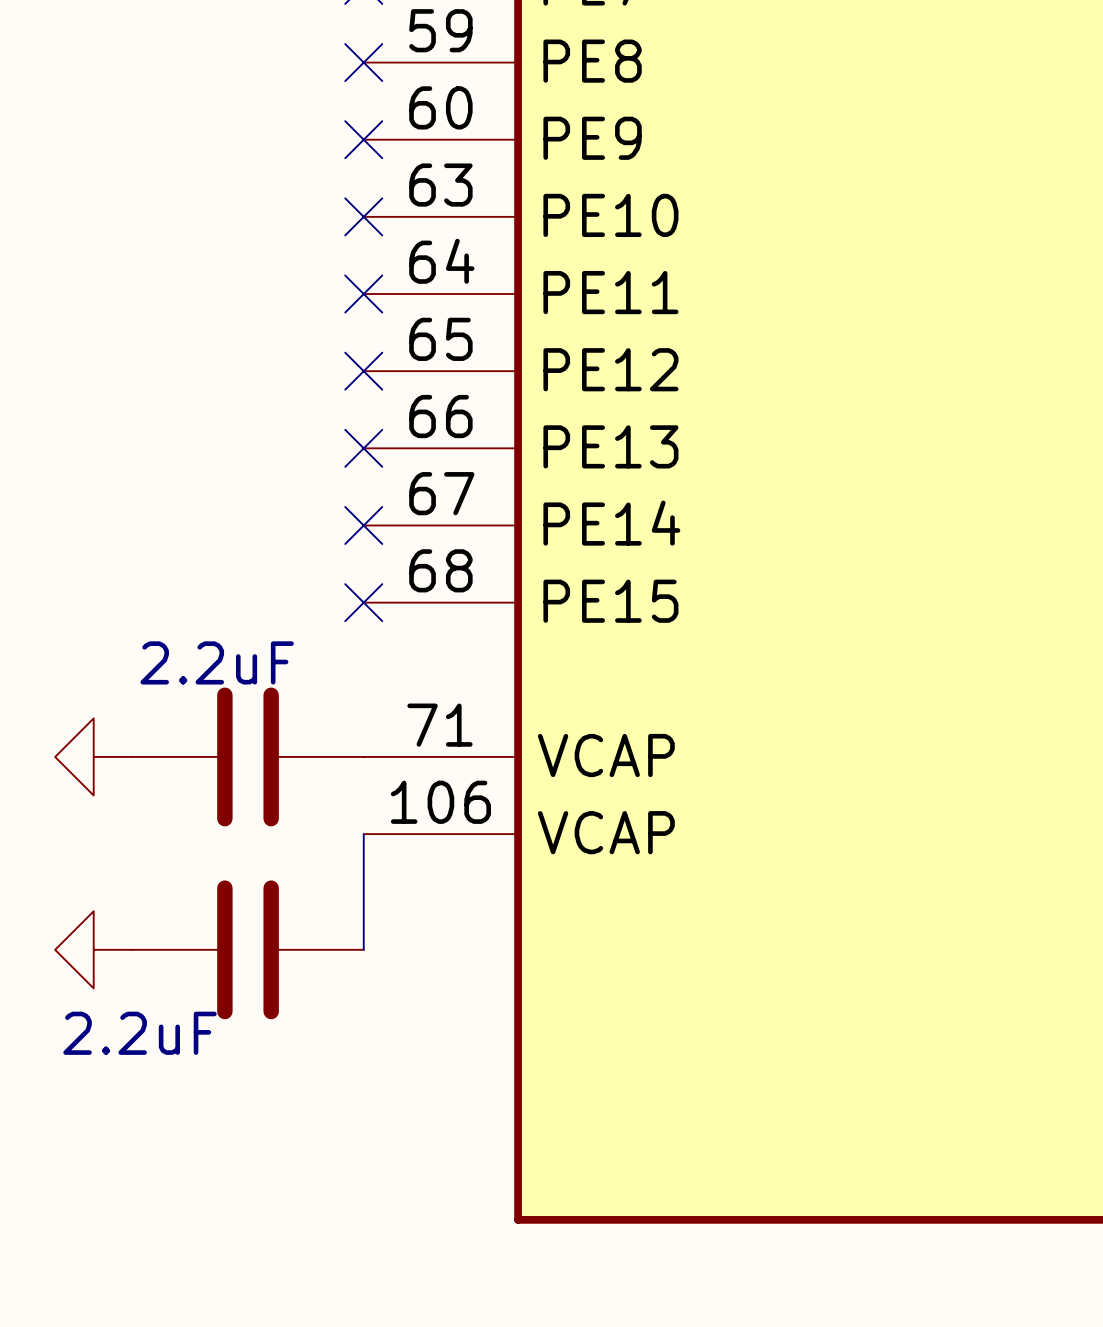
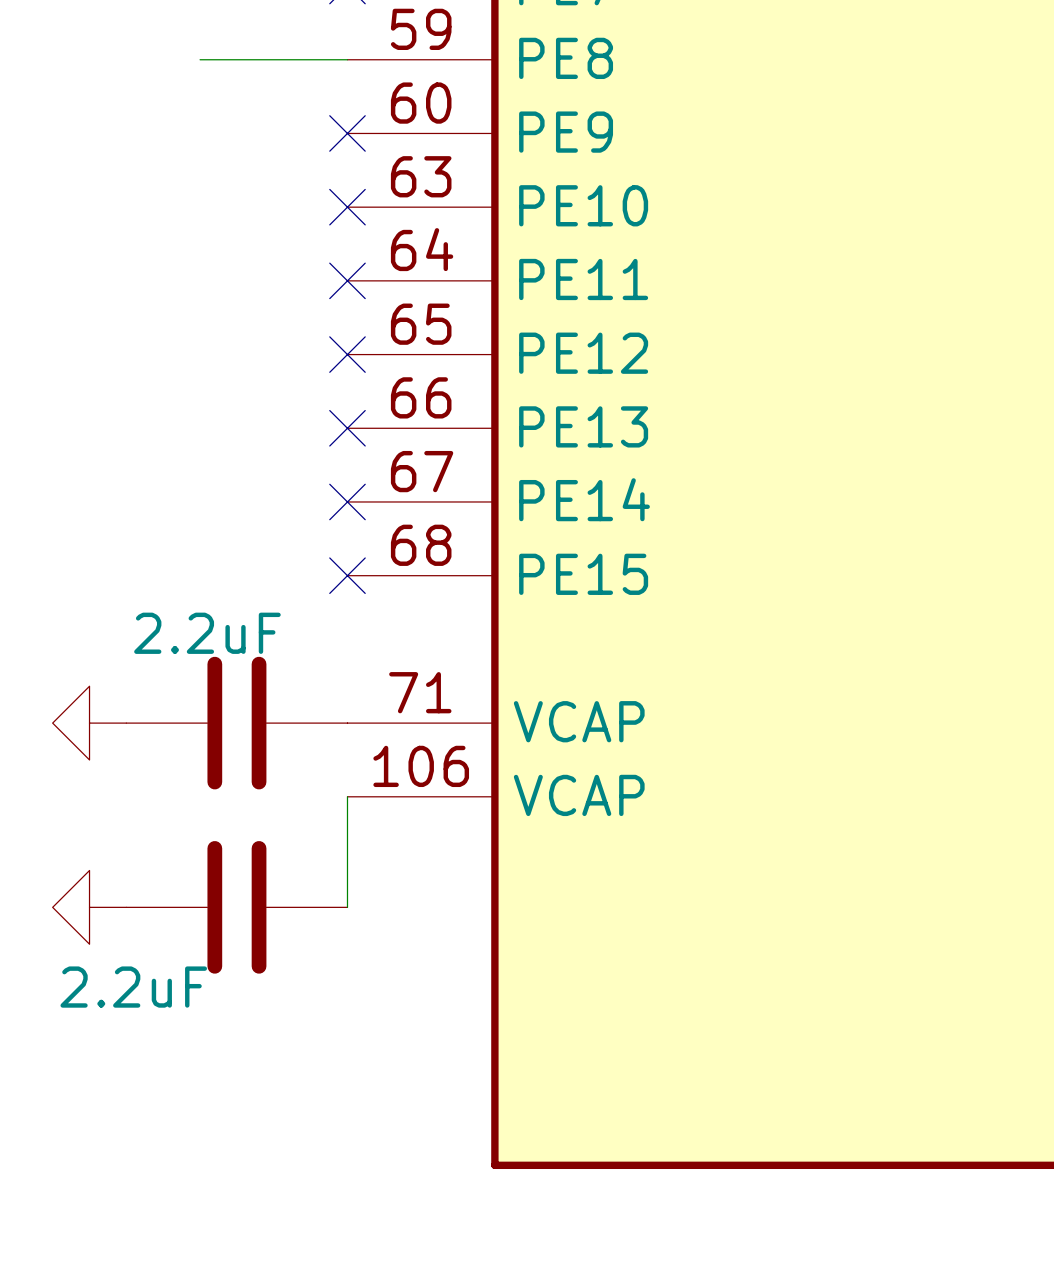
wire: none -> (200, 59) (347, 59)
no-connect mark: (363, 62) -> none

